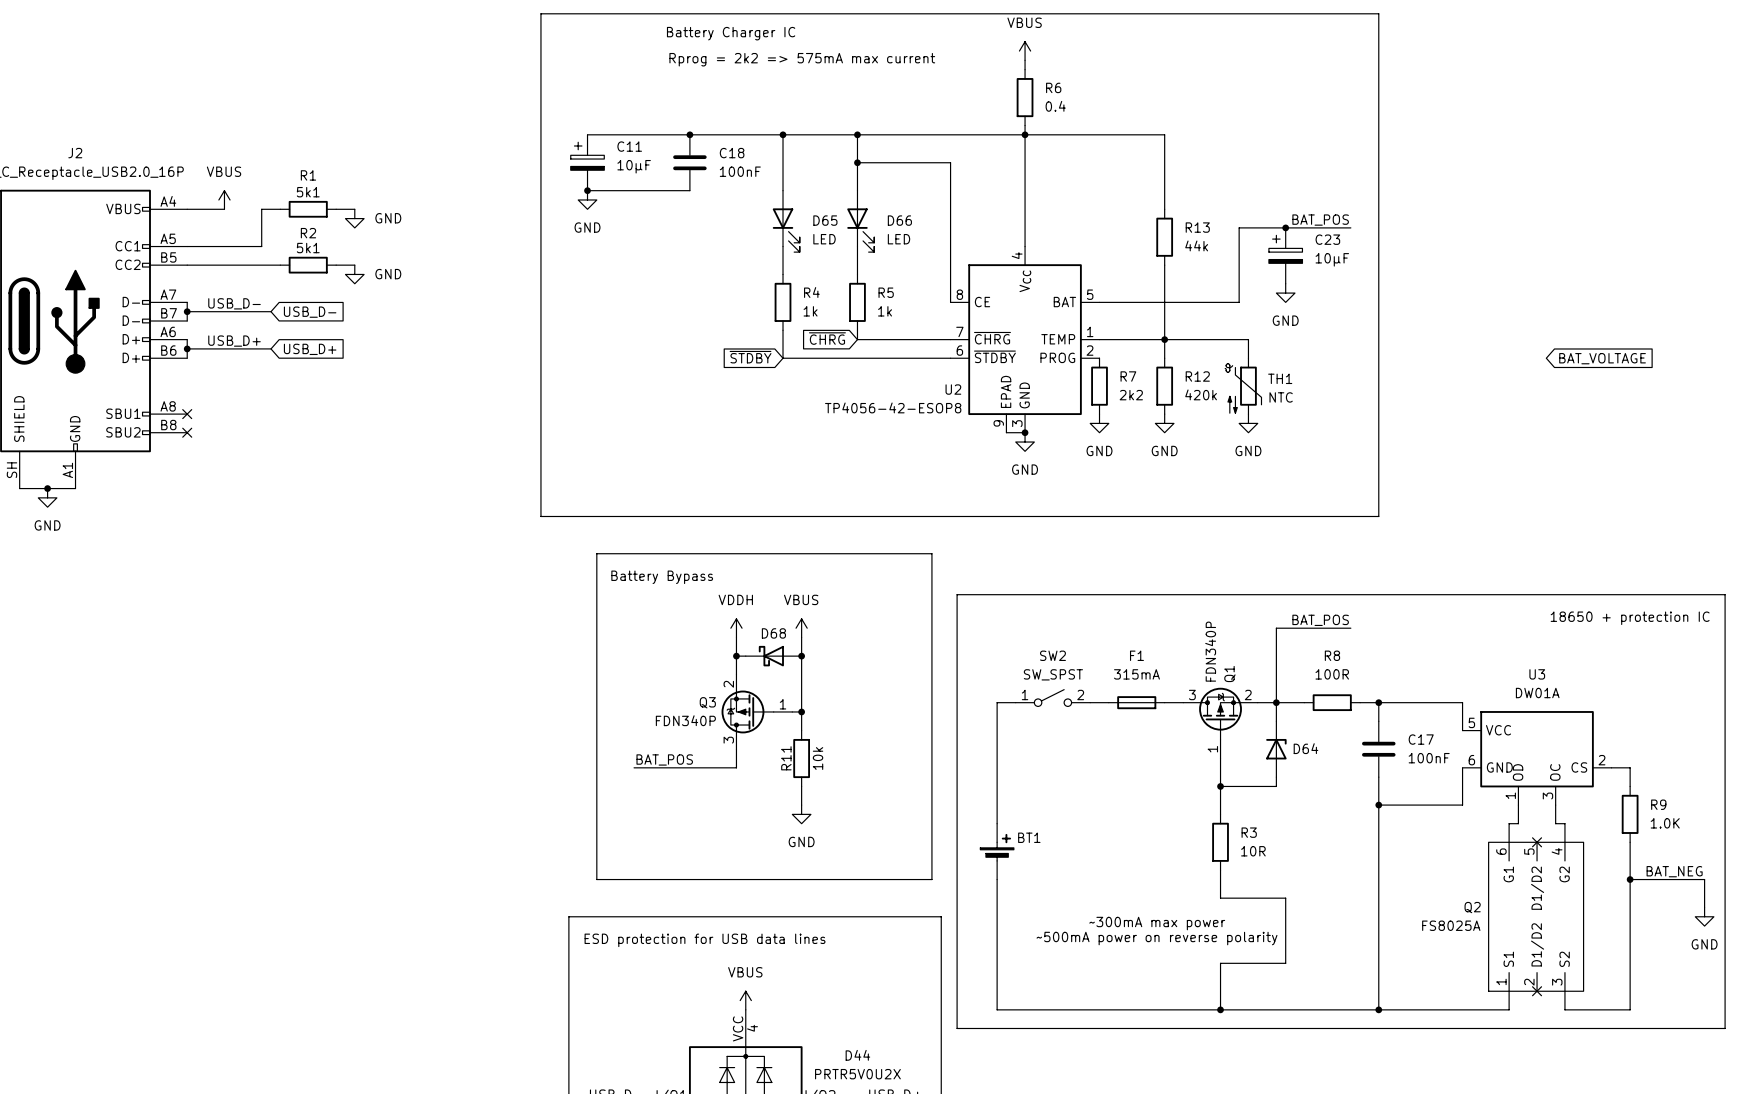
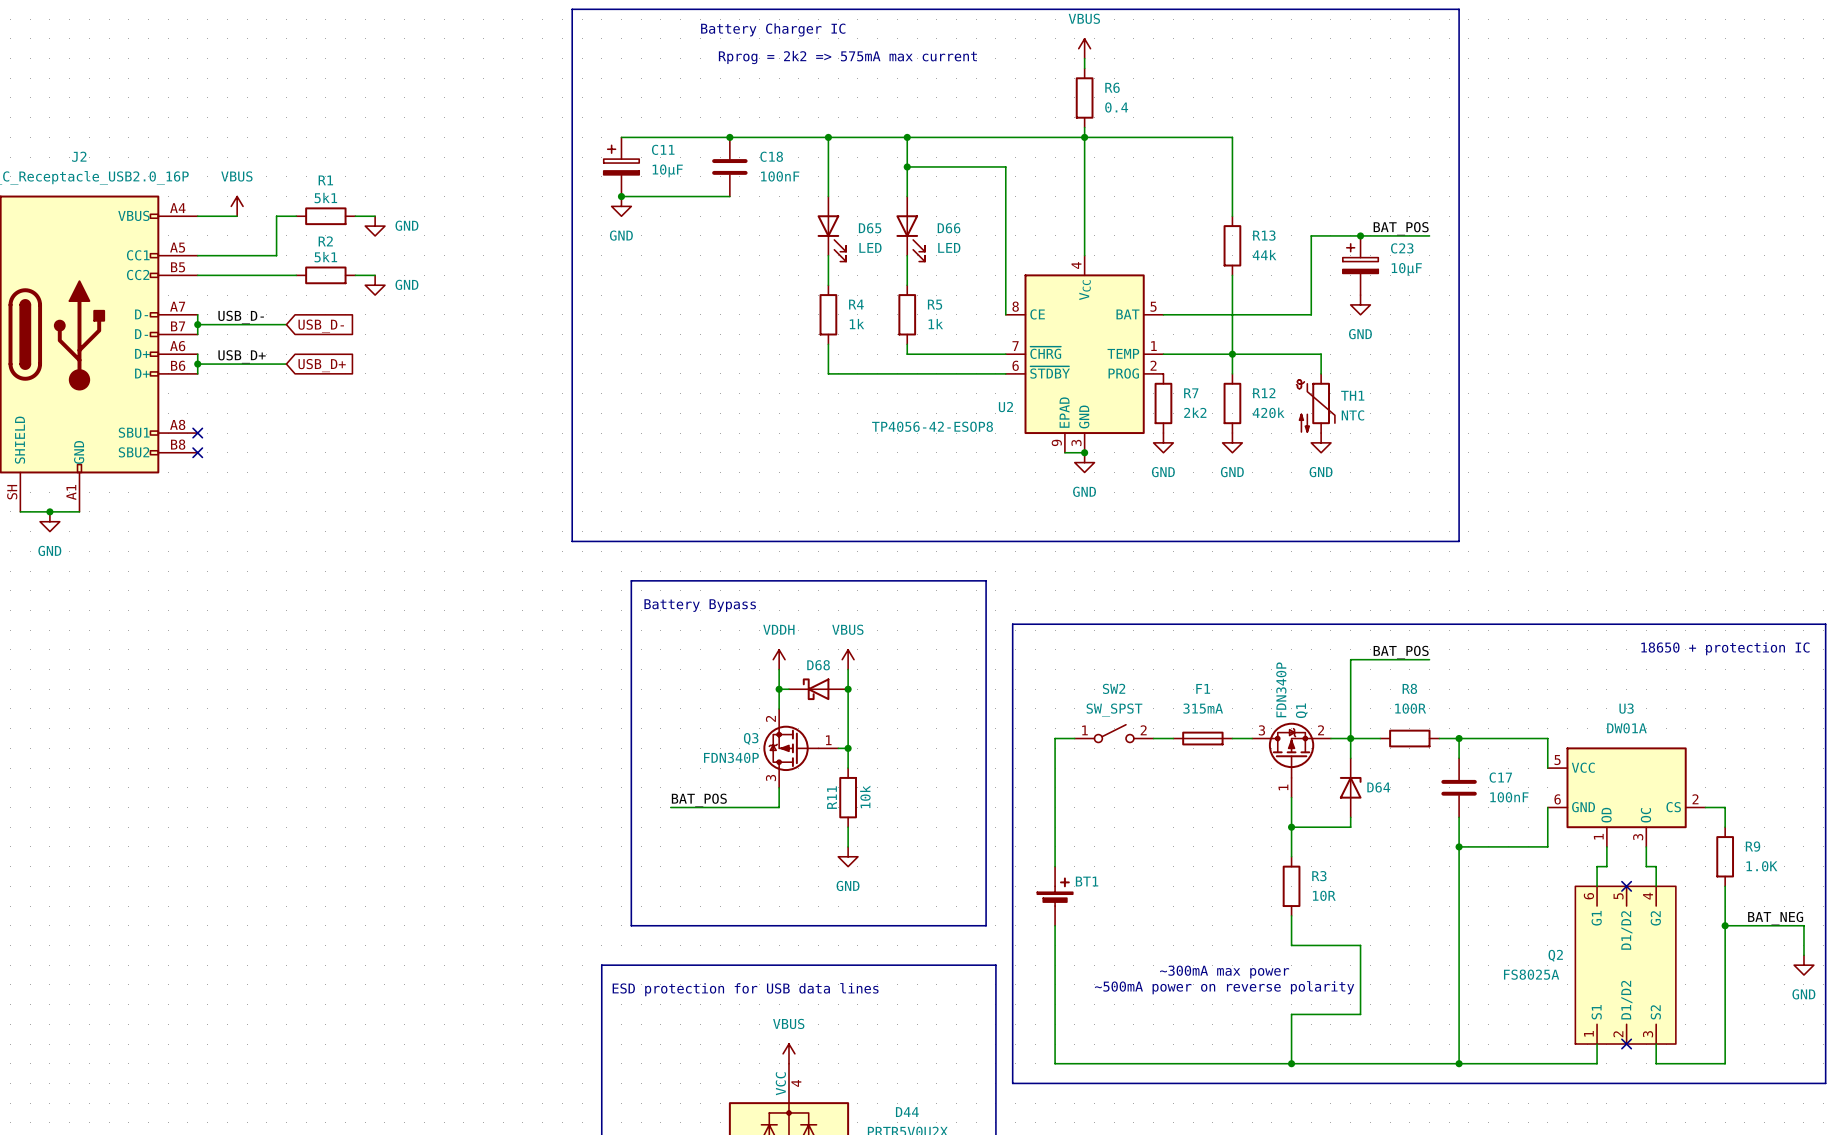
global label: ~{CHRG} (827, 338) -> none
global label: ~{STDBY} (750, 357) -> none
global label: BAT_VOLTAGE (1602, 358) -> none

